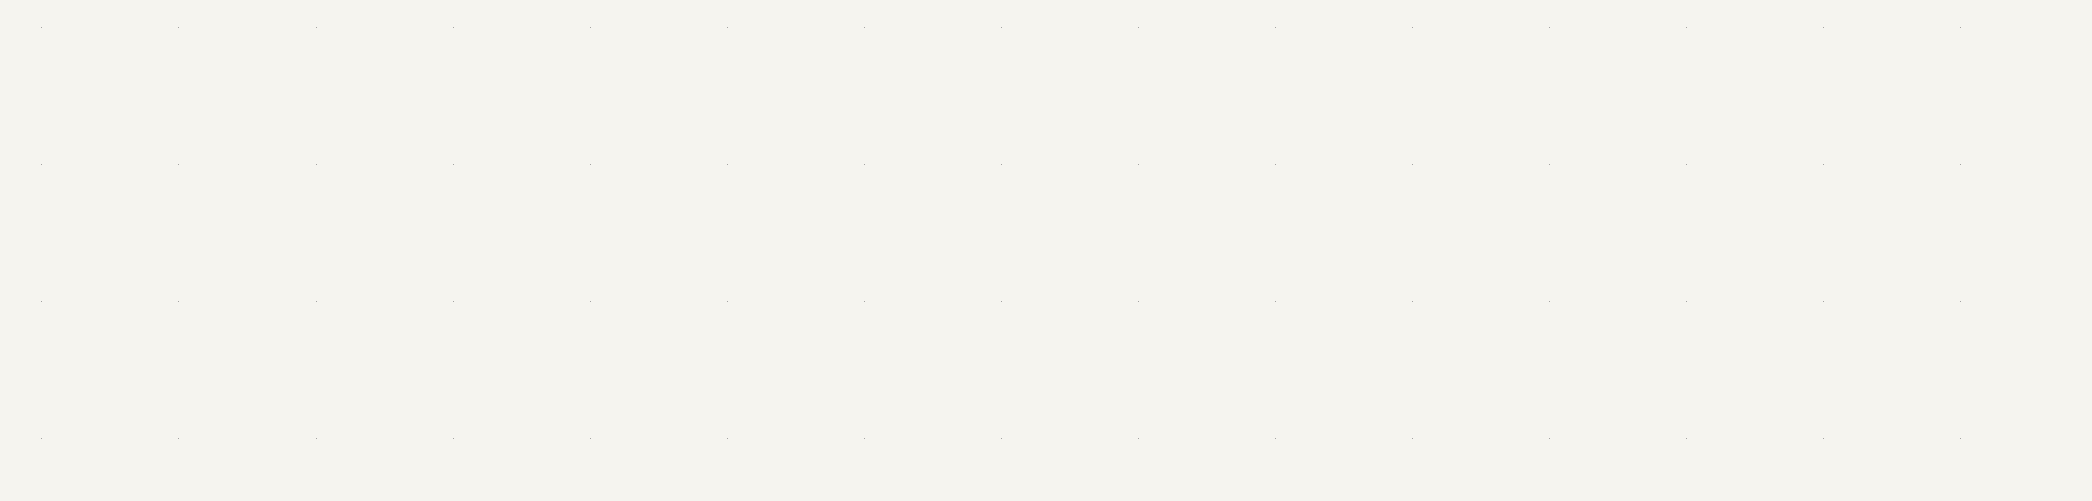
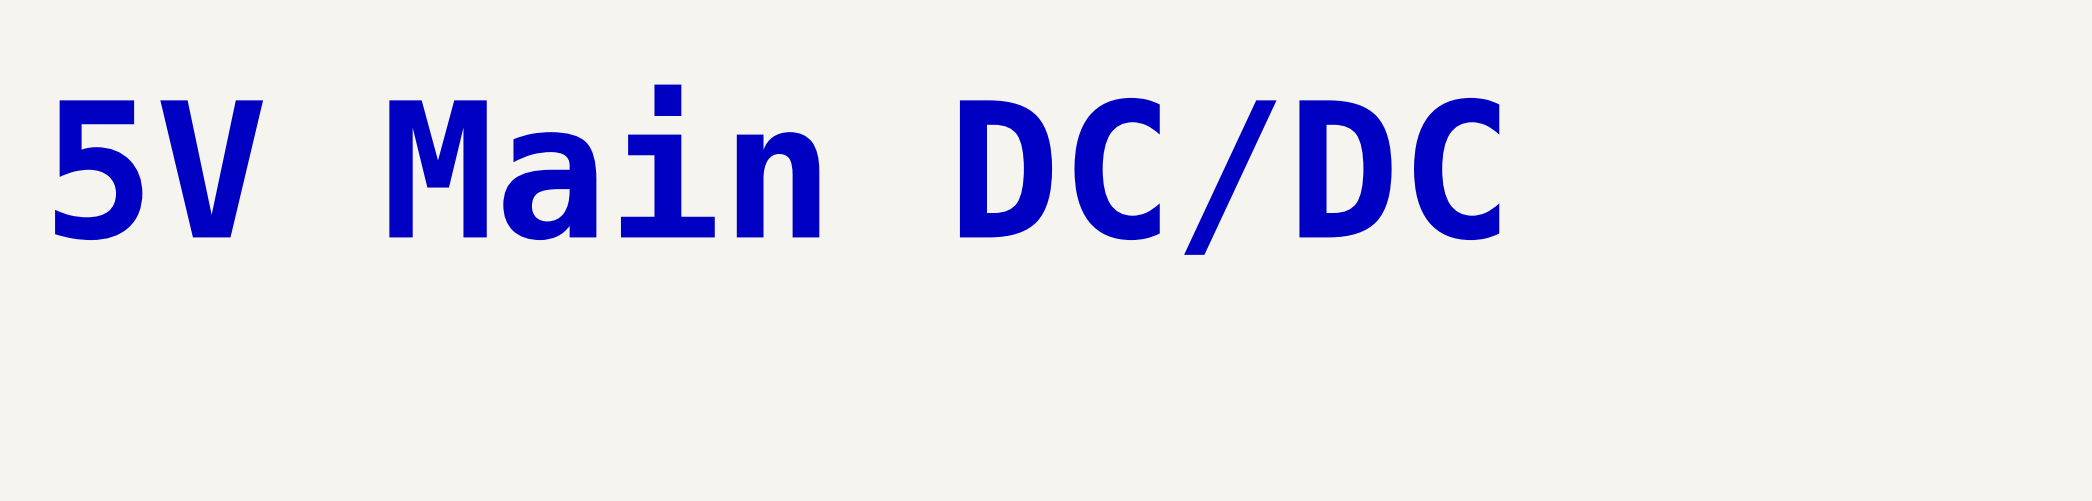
text: none -> 5V Main DC/DC (777, 169)

